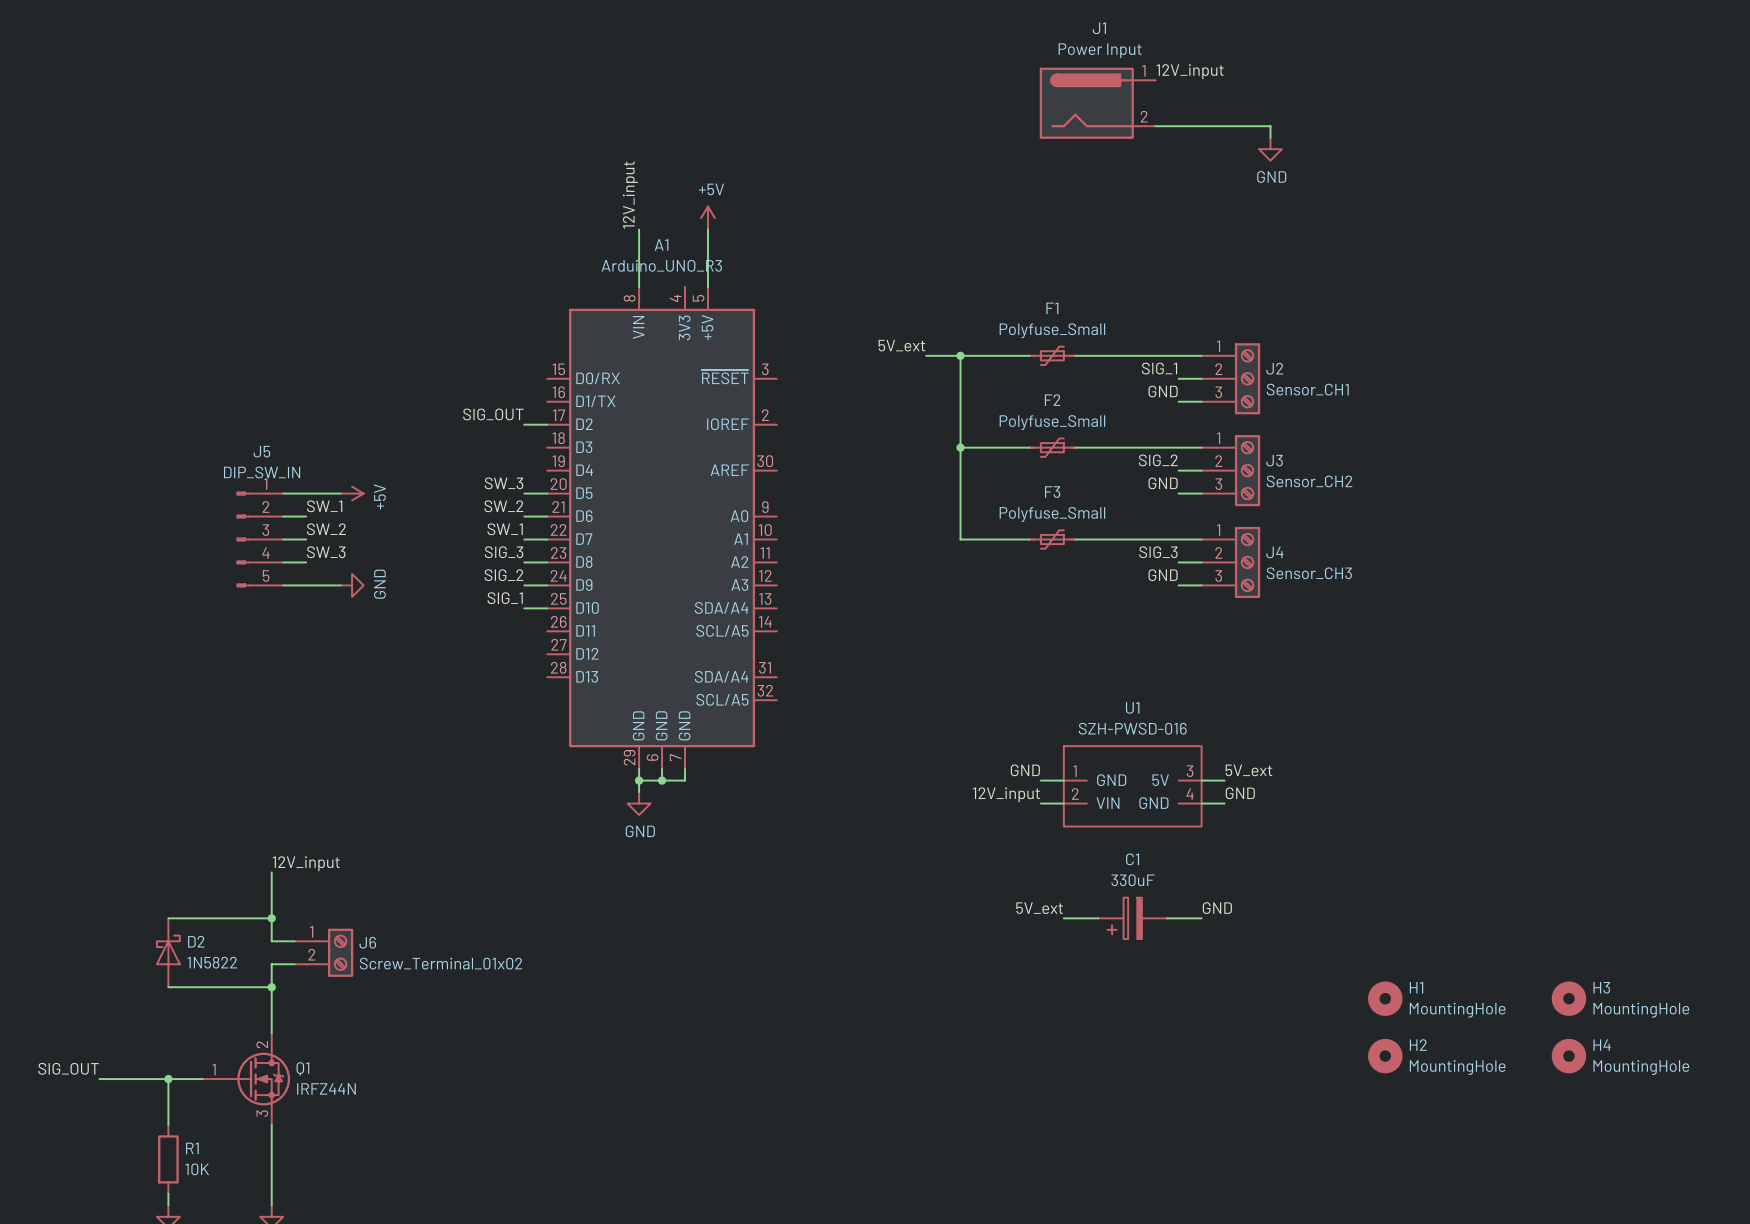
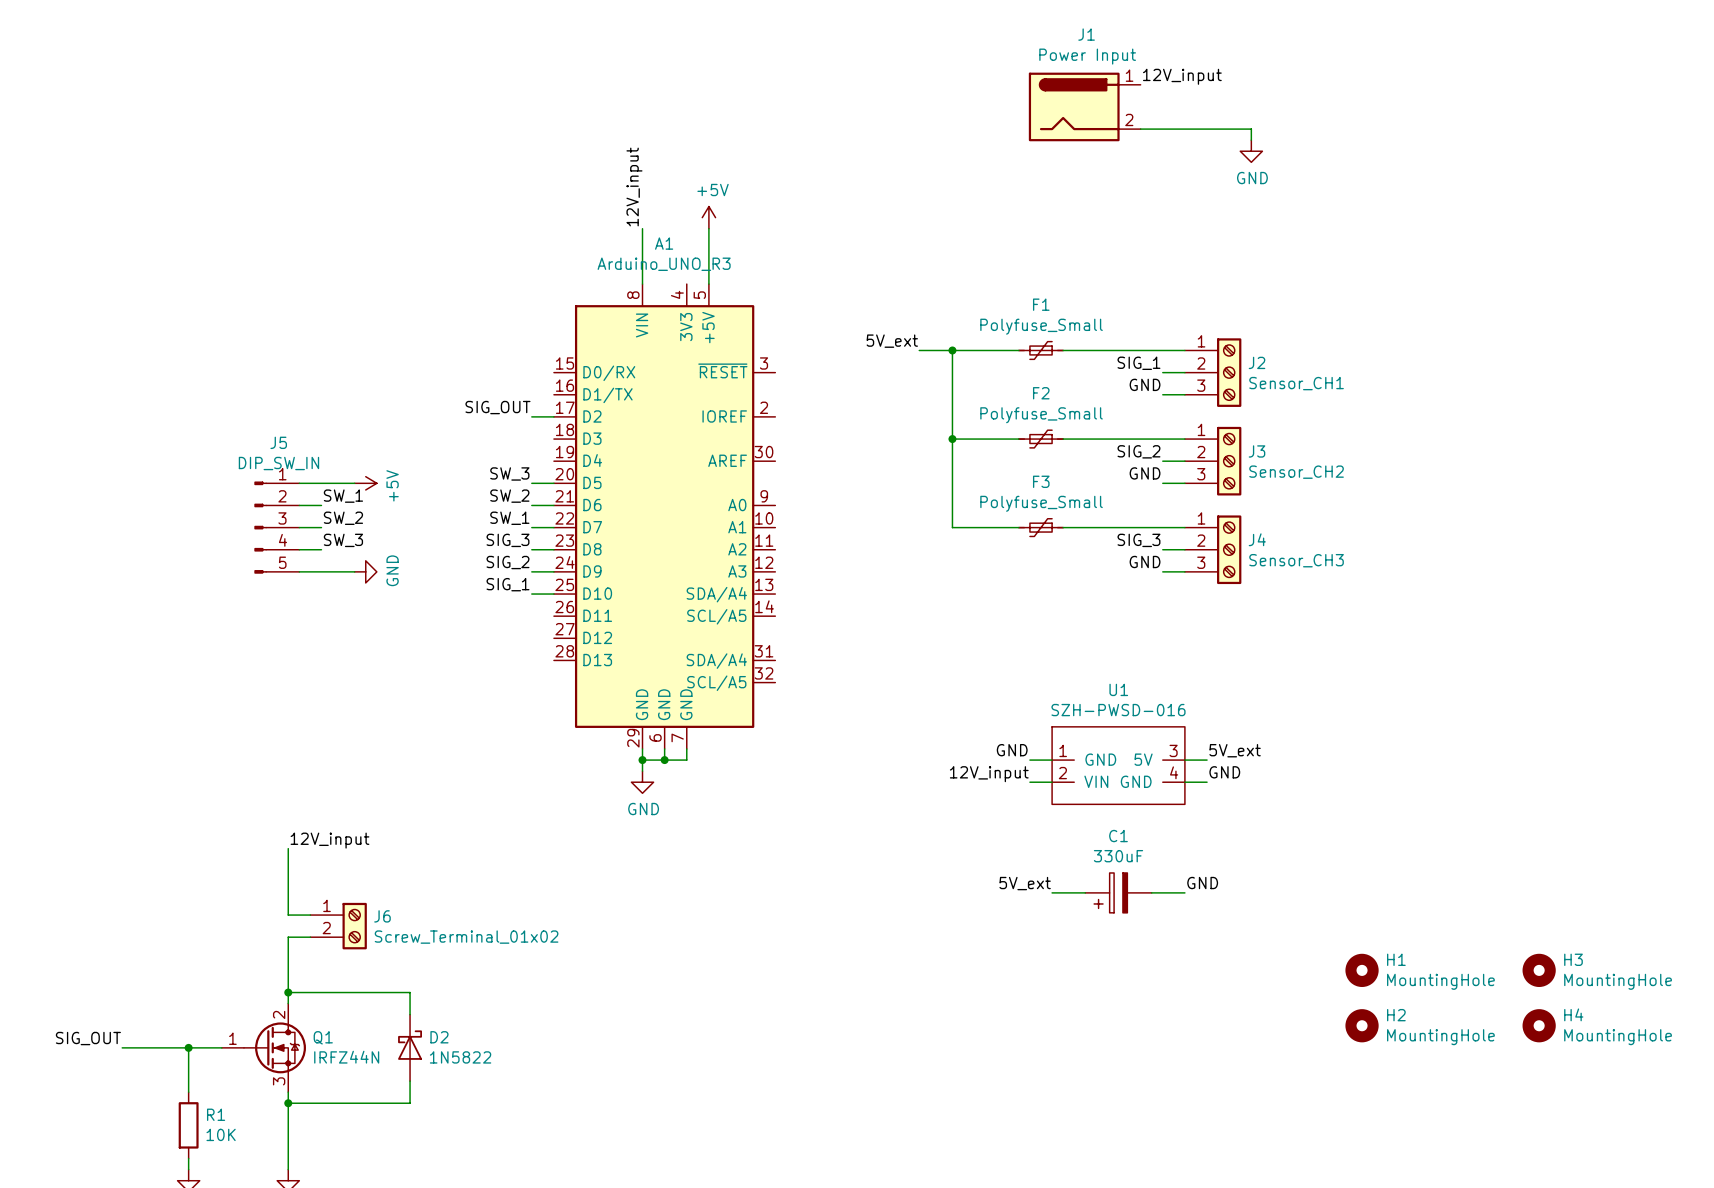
wire: (168, 918) (271, 918) -> none
junction: (271, 918) -> none
D2 position: (168, 952) -> (410, 1047)
wire: (168, 987) (271, 987) -> none
junction position: (271, 987) -> (288, 992)
wire: none -> (288, 992) (410, 992) (410, 1014)
wire: none -> (410, 1081) (410, 1103) (288, 1103)
junction: none -> (288, 1103)

